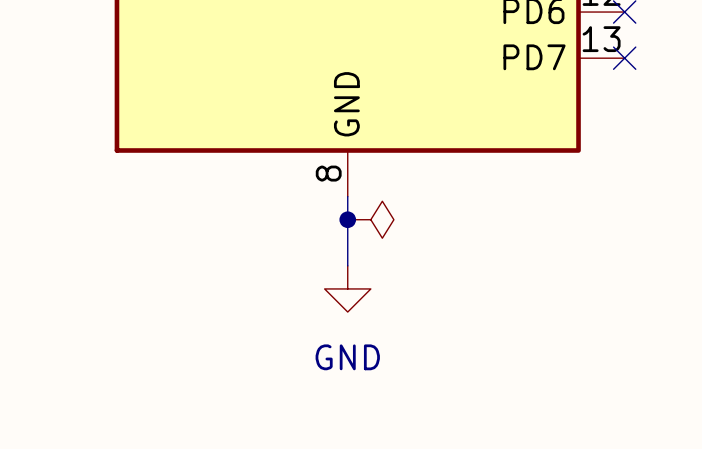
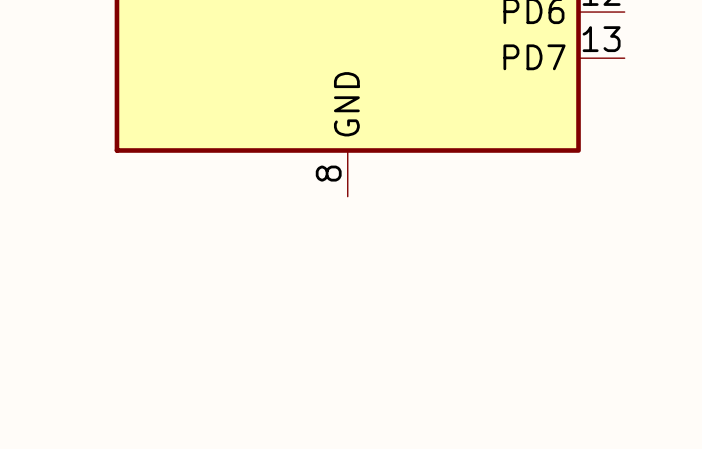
no-connect mark: (624, 12) -> none
no-connect mark: (624, 58) -> none
wire: (347, 196) (347, 265) -> none
junction: (347, 219) -> none
power symbol: (370, 219) -> none
power symbol: GND (347, 288) -> none

